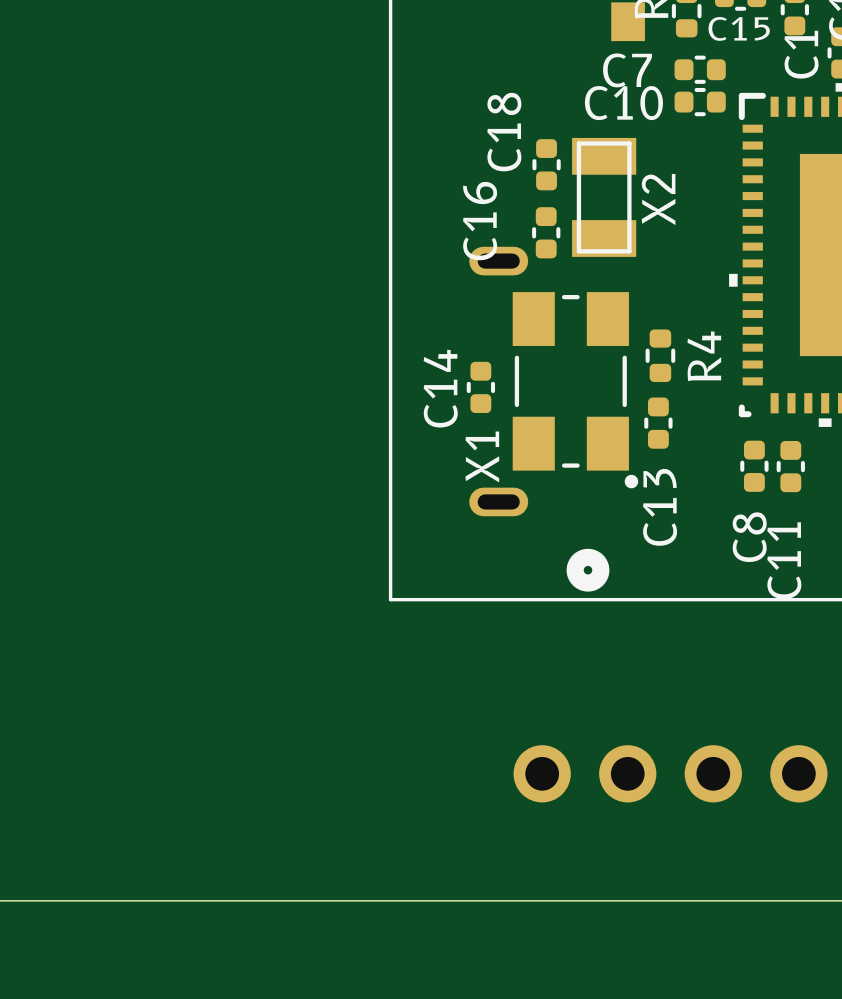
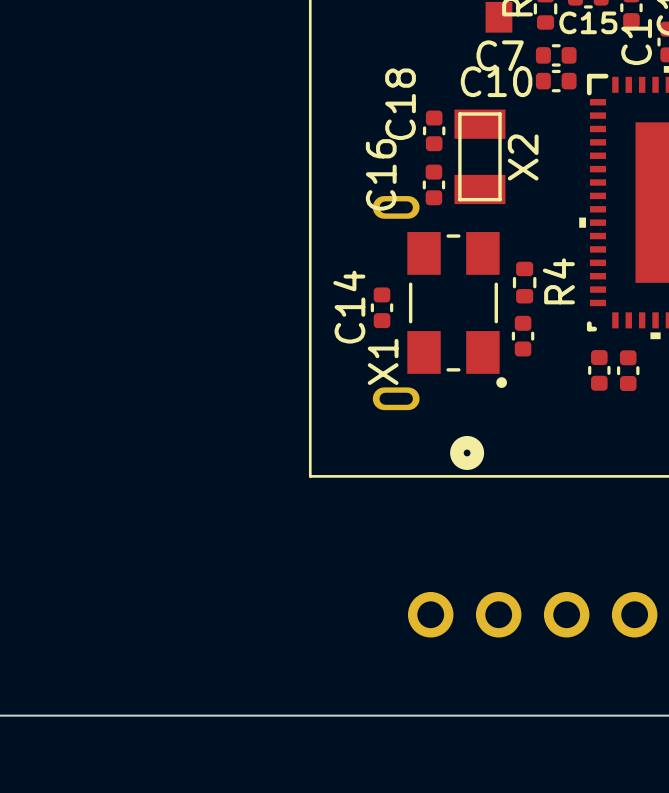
C13 name: C13 (660, 507) -> none
C8 name: C8 (749, 537) -> none
C11 name: C11 (784, 560) -> none

